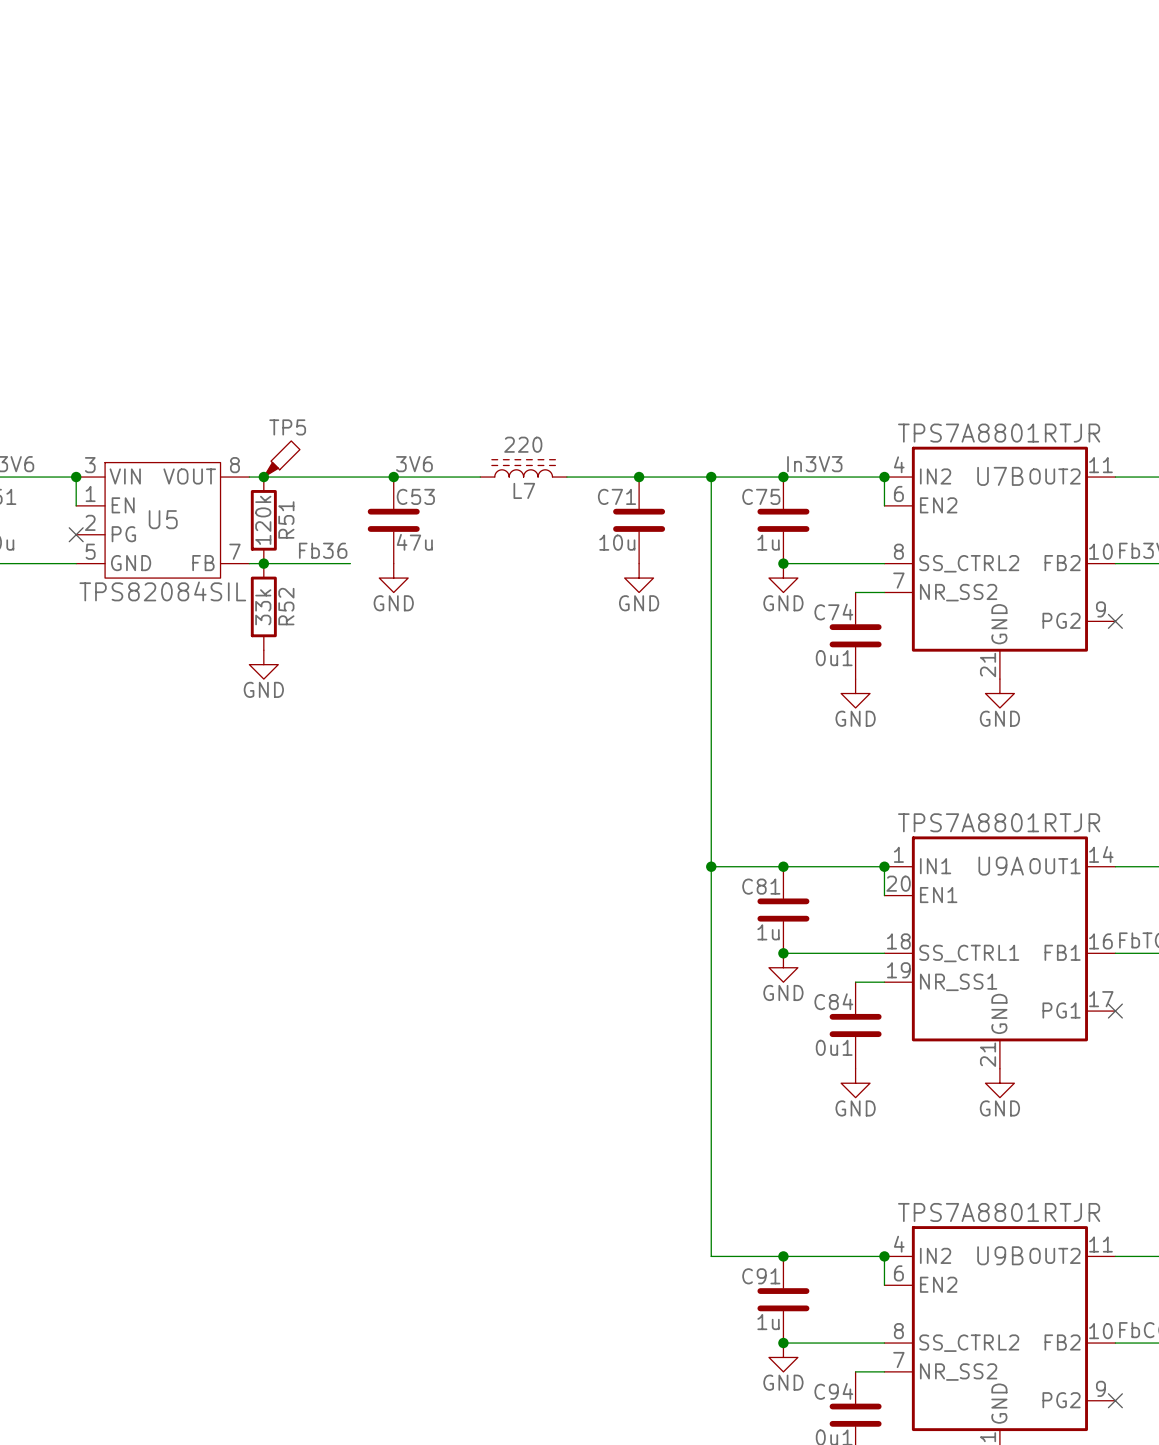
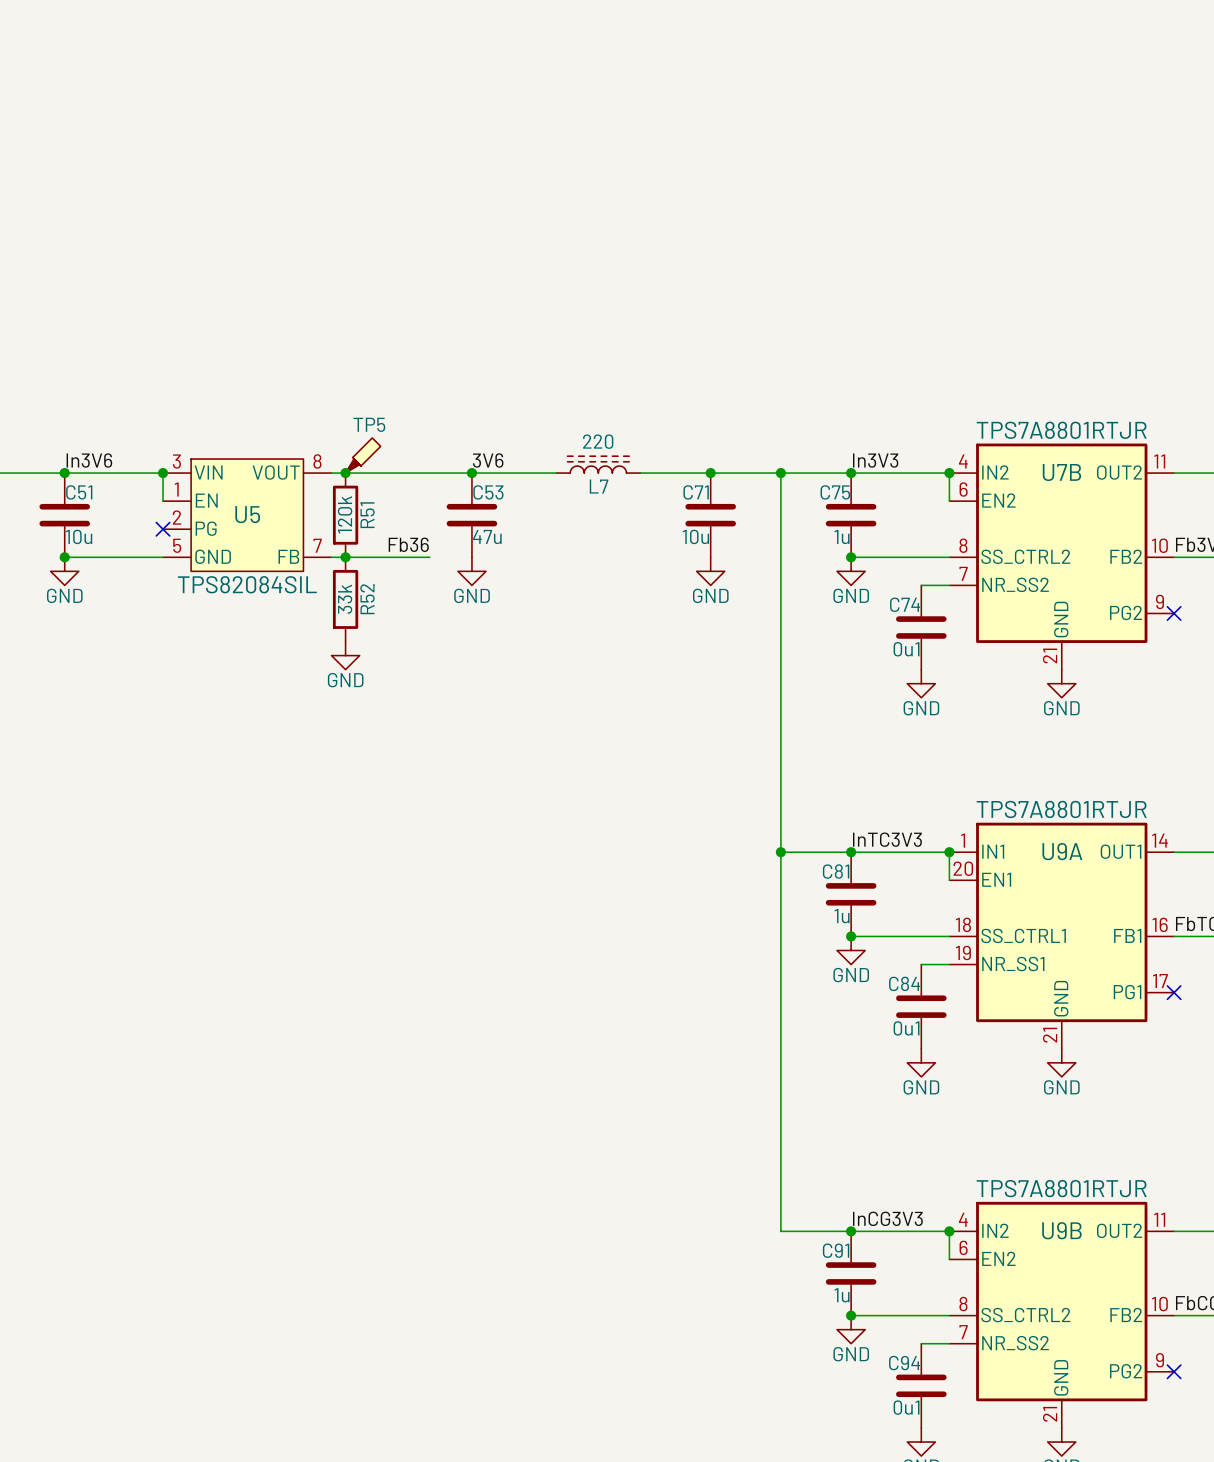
label: none -> InTC3V3 (887, 839)
label: none -> InCG3V3 (887, 1218)

